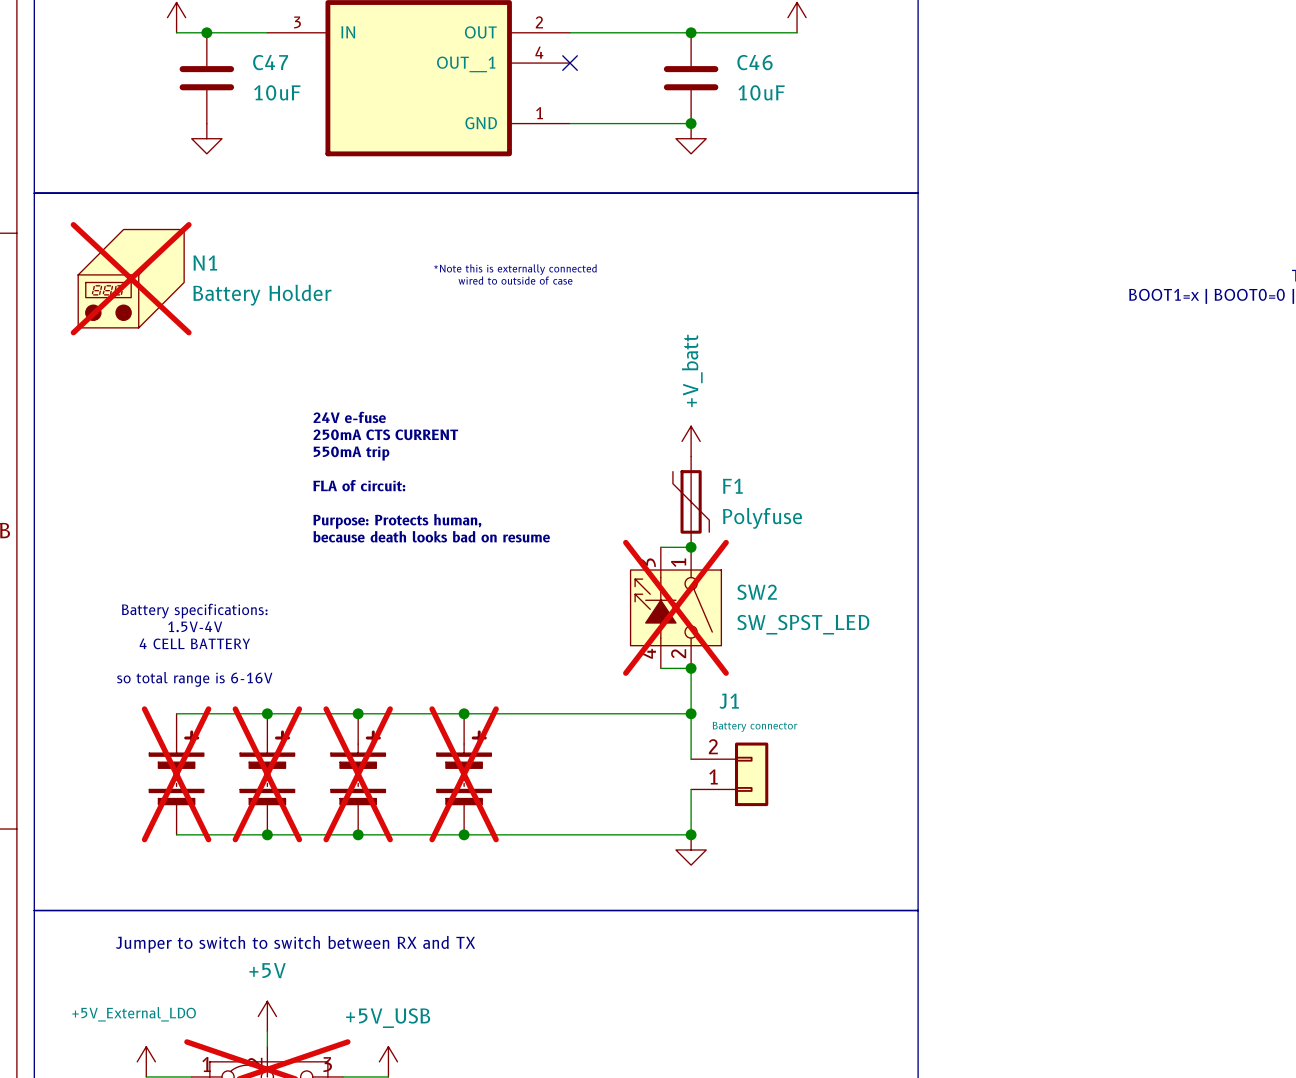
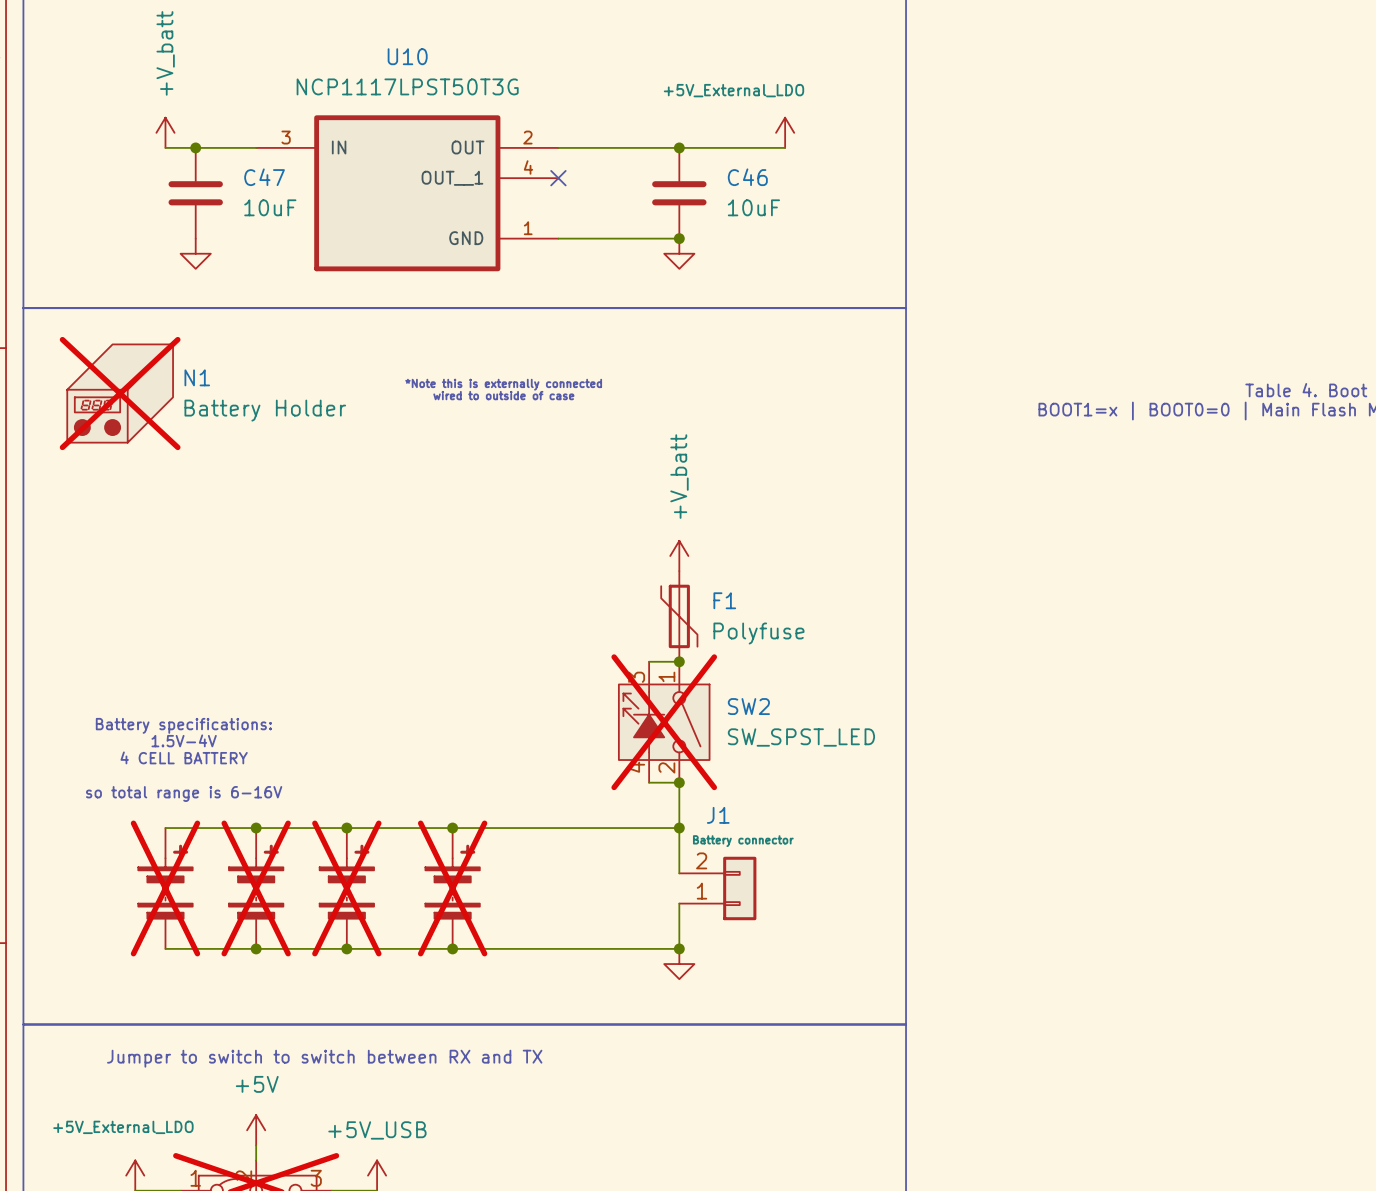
text: 24V e-fuse (349, 417) -> none
text: 250mA CTS CURRENT (385, 434) -> none
text: 550mA trip (351, 453) -> none
text: FLA of circuit: (359, 485) -> none
text: Purpose: Protects human, (397, 521) -> none
text: because death looks bad on resume (431, 536) -> none

